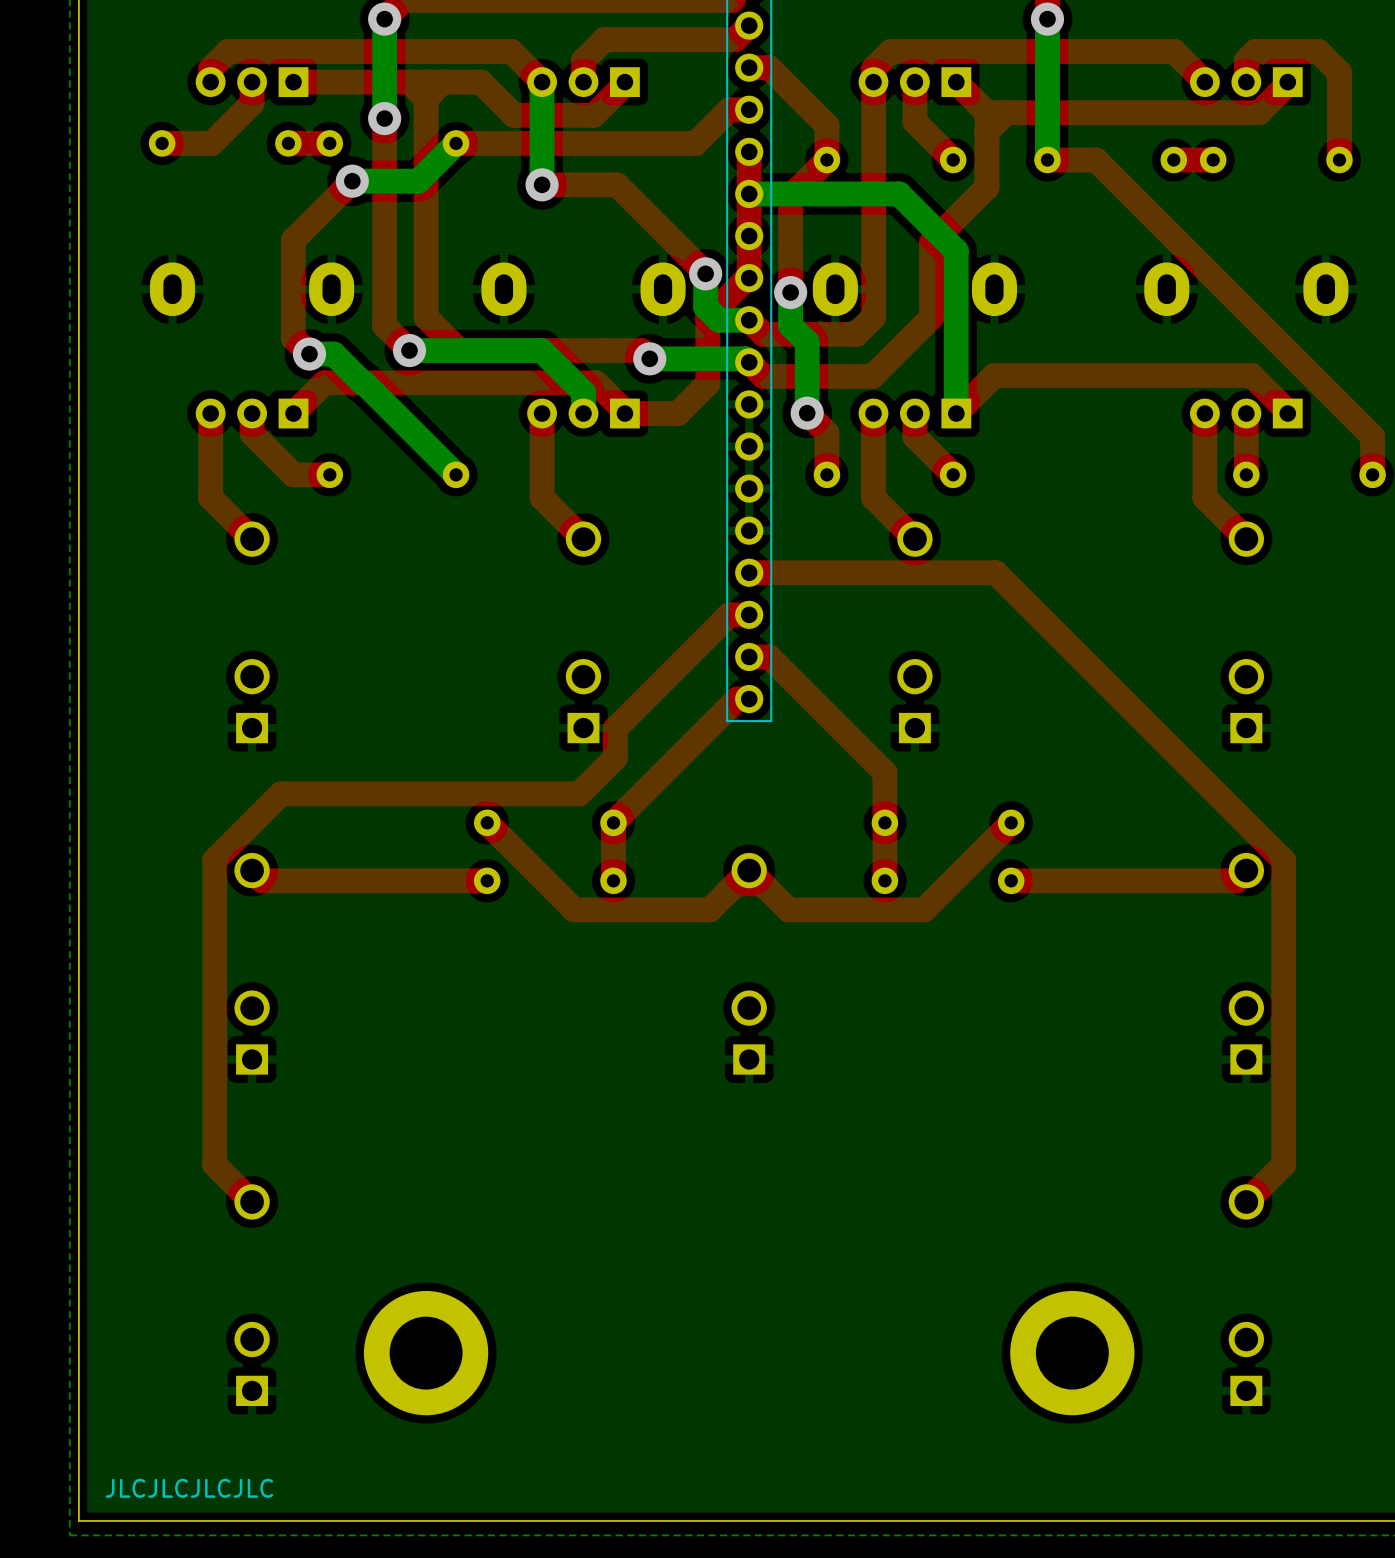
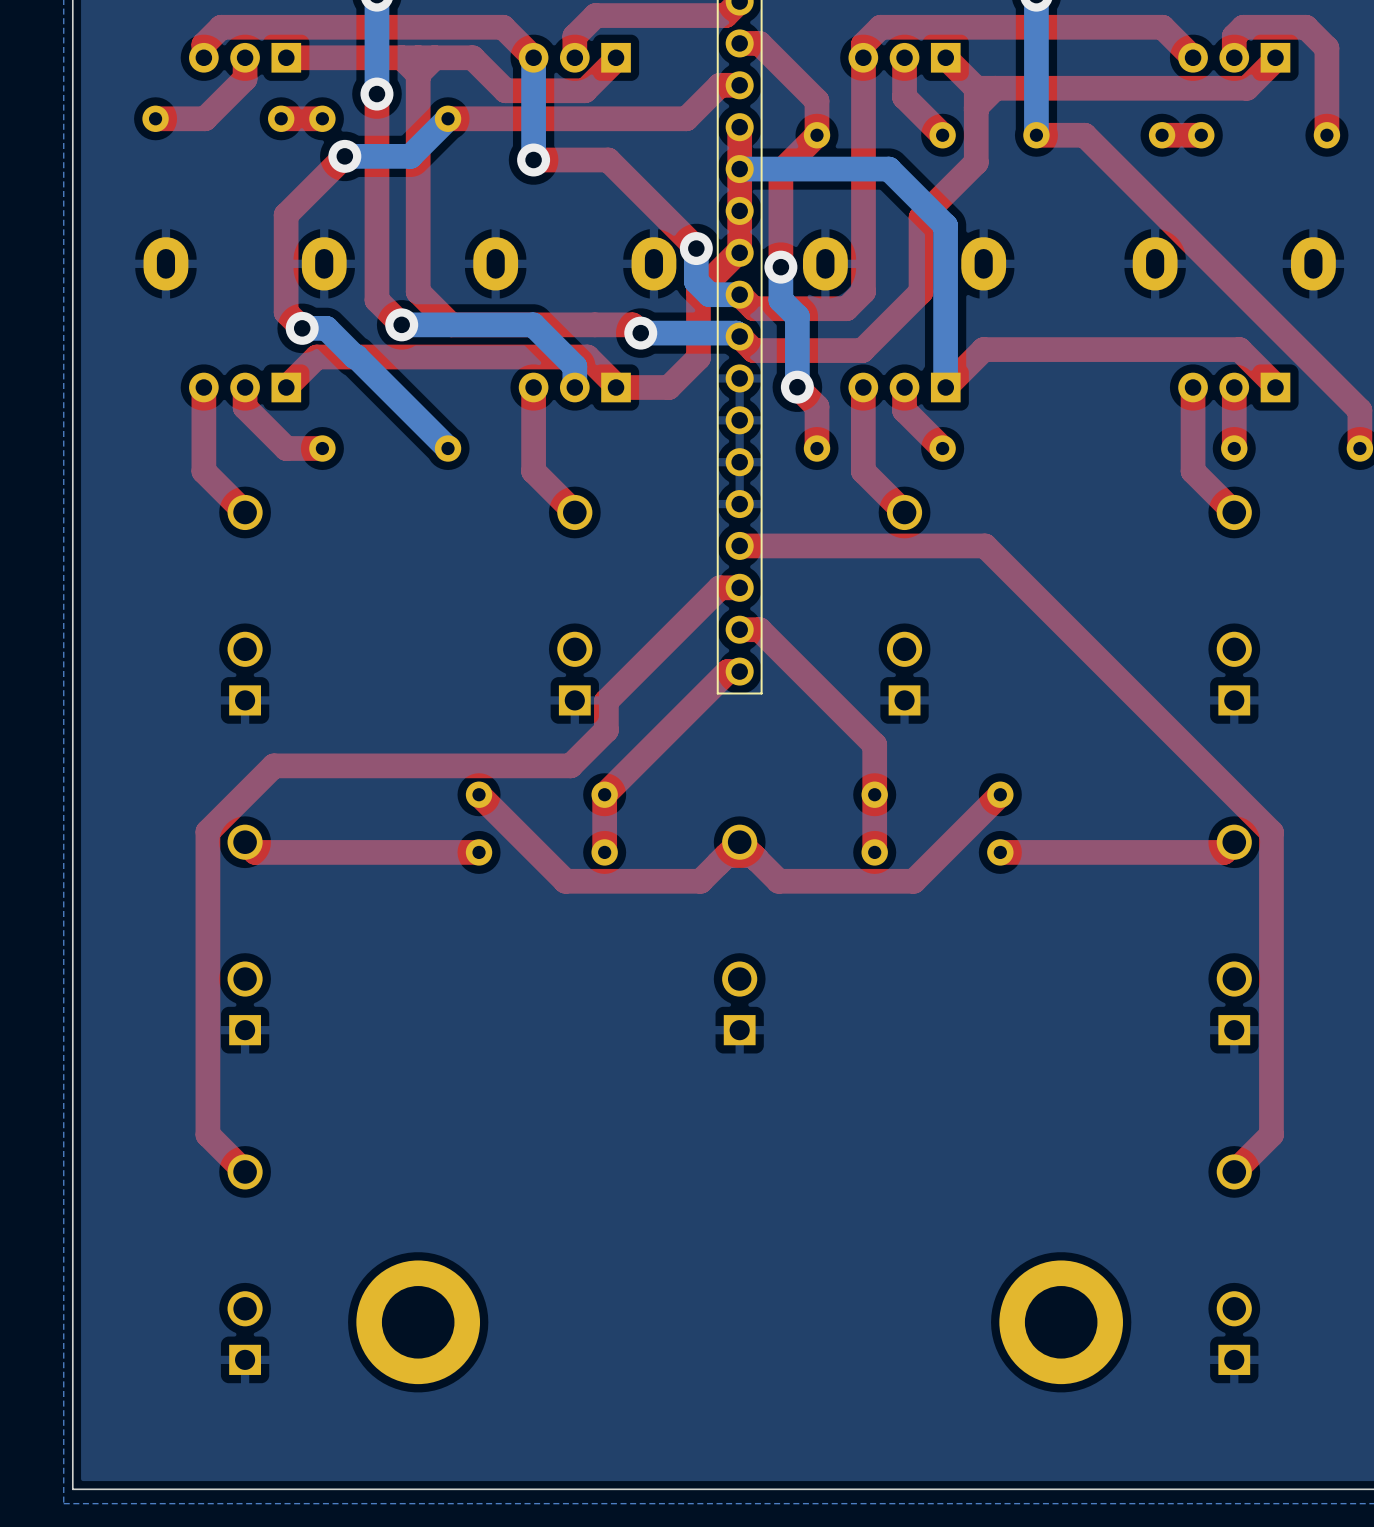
text: JLCJLCJLCJLC (189, 1488) -> none

